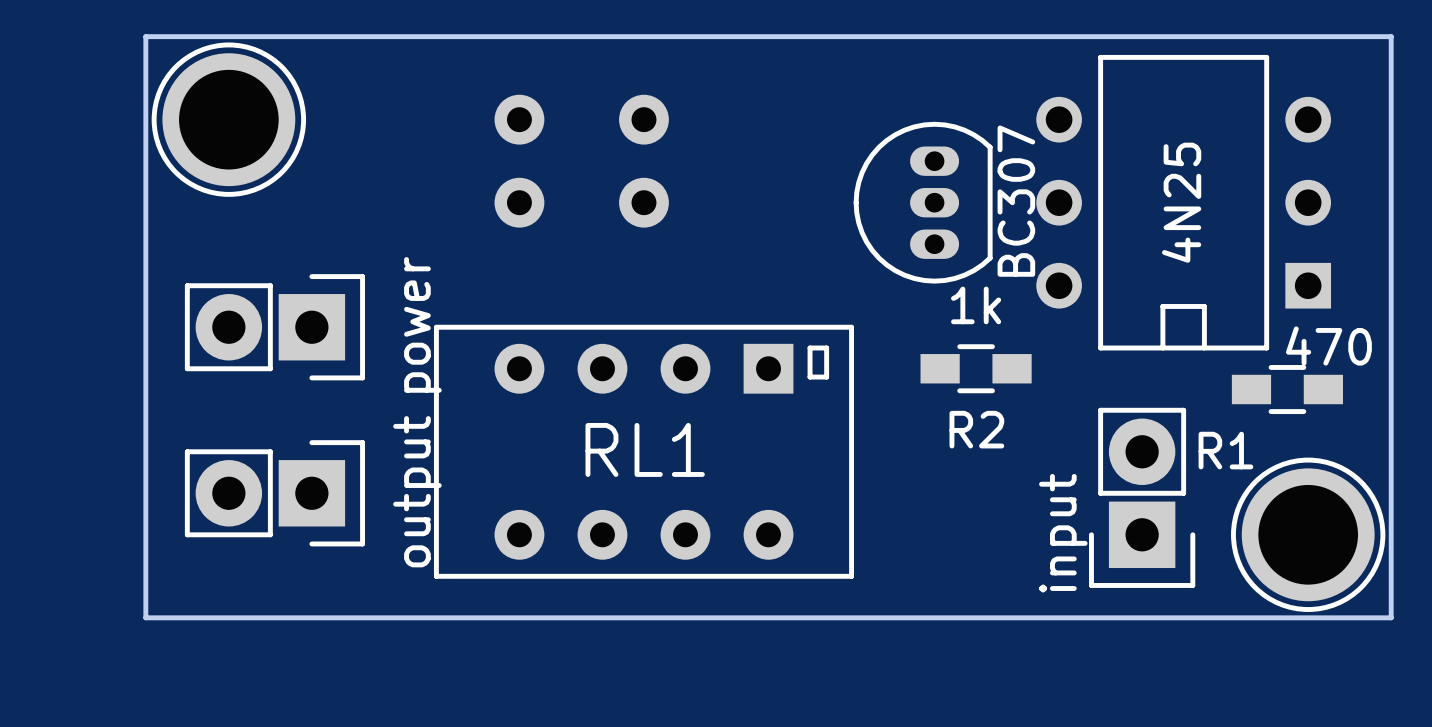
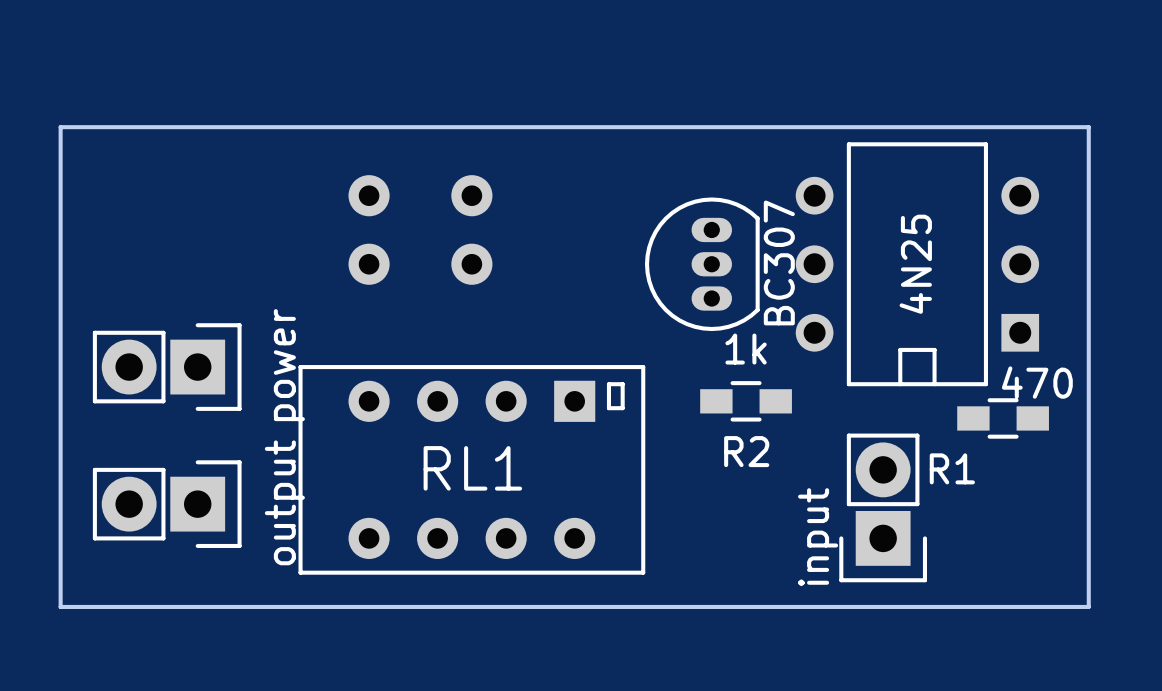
part: (228, 119) -> none
part: (1308, 534) -> none

